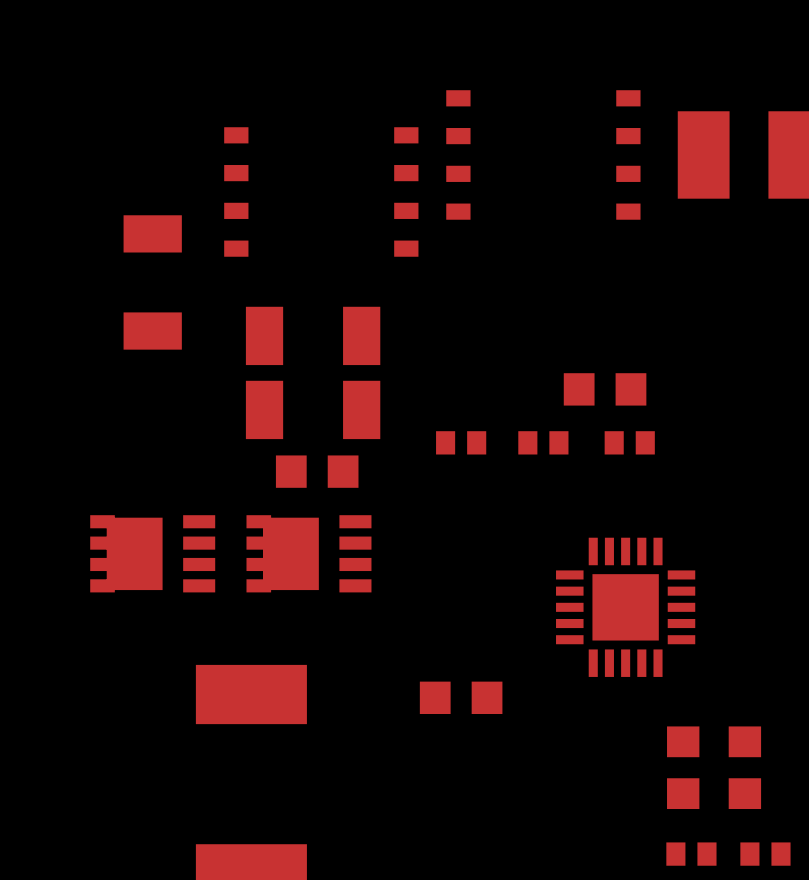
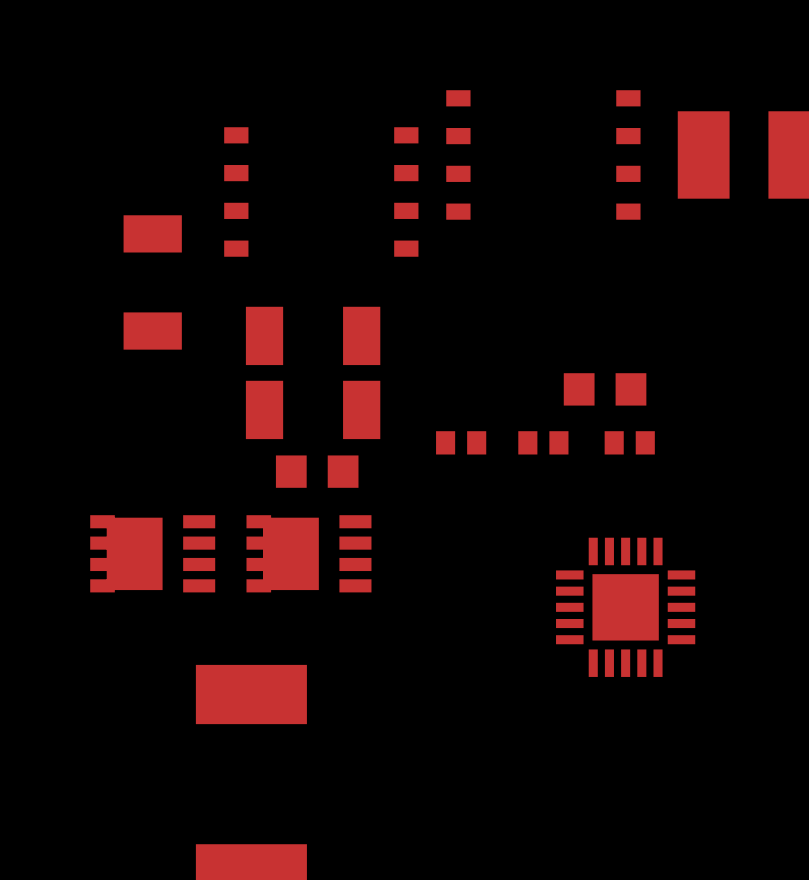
part: (461, 697) -> none
part: (683, 767) -> none
part: (744, 767) -> none
part: (691, 854) -> none
part: (765, 854) -> none

